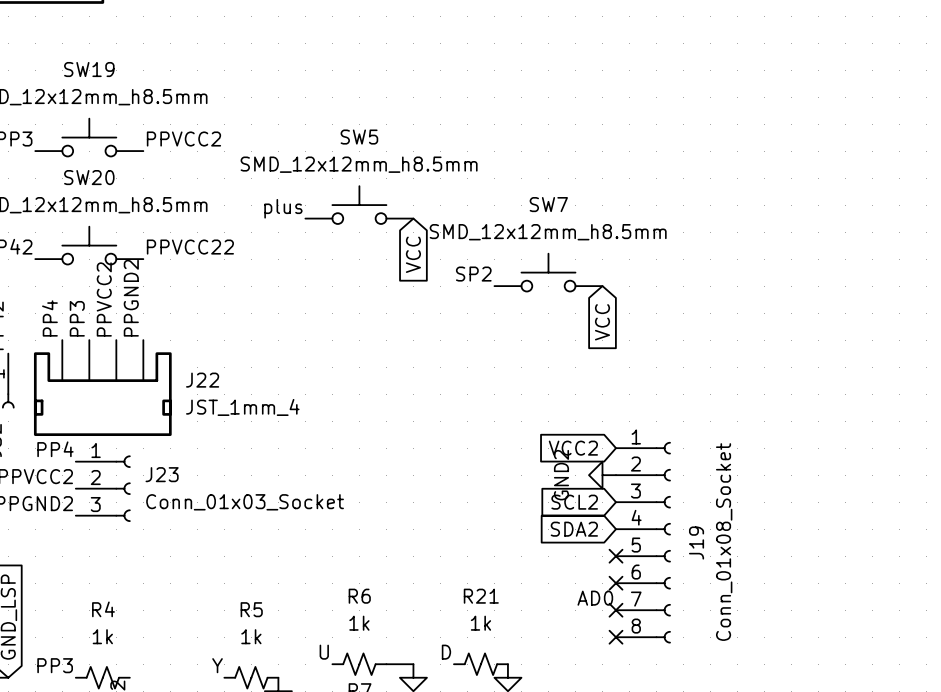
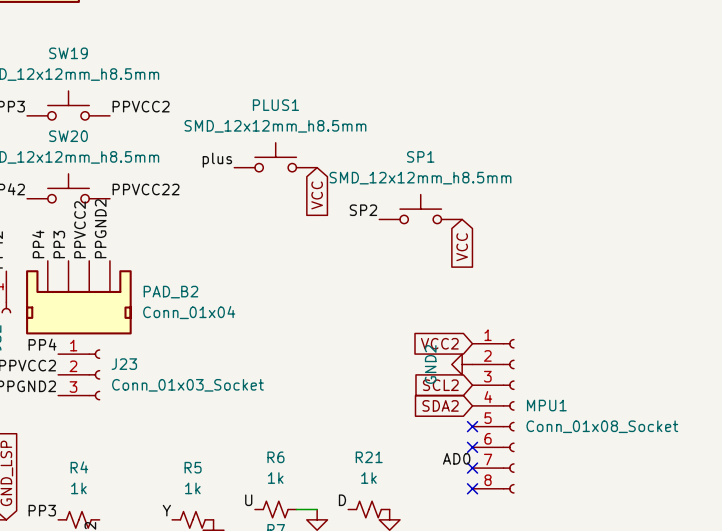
SW5 name: SW5 (359, 137) -> PLUS1 (275, 105)
SW7 name: SW7 (548, 204) -> SP1 (420, 156)
J22 name: J22 (202, 380) -> PAD_B2 (170, 292)
J22 value: JST_1mm_4 (242, 407) -> Conn_01x04 (189, 312)
J19 value rotation: 0° (724, 542) -> 90° clockwise (602, 426)
J19 name: J19 (696, 543) -> MPU1 (546, 405)

